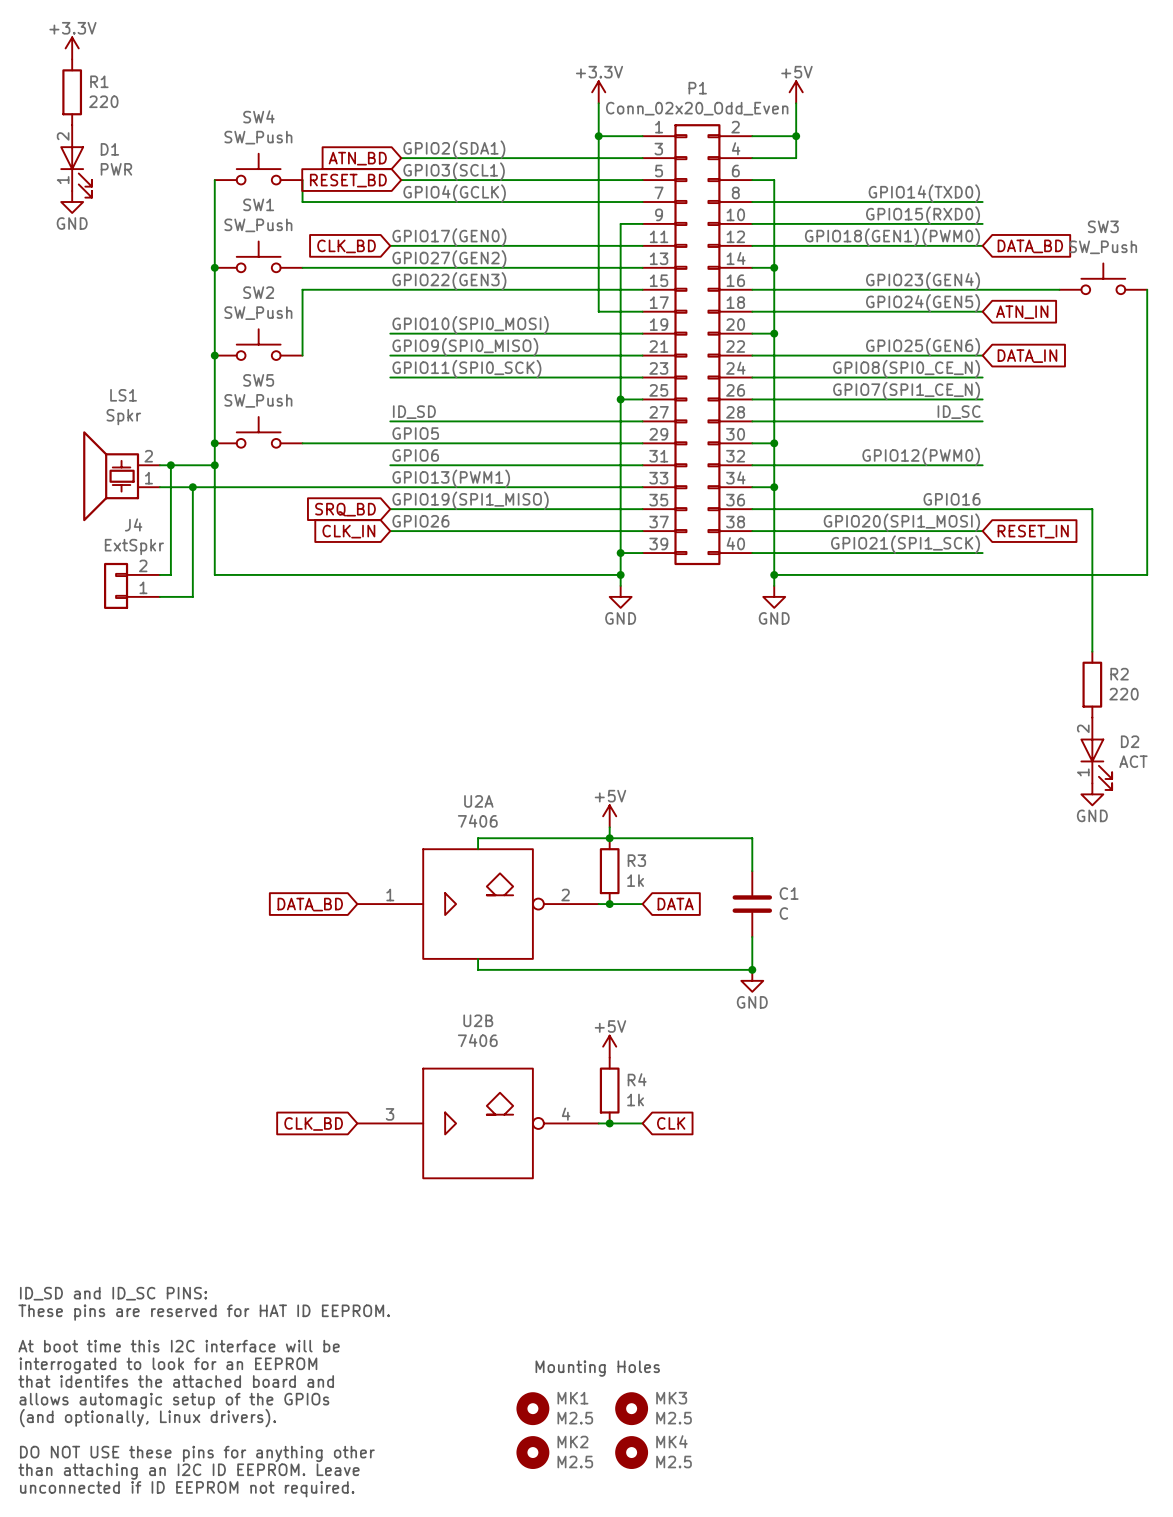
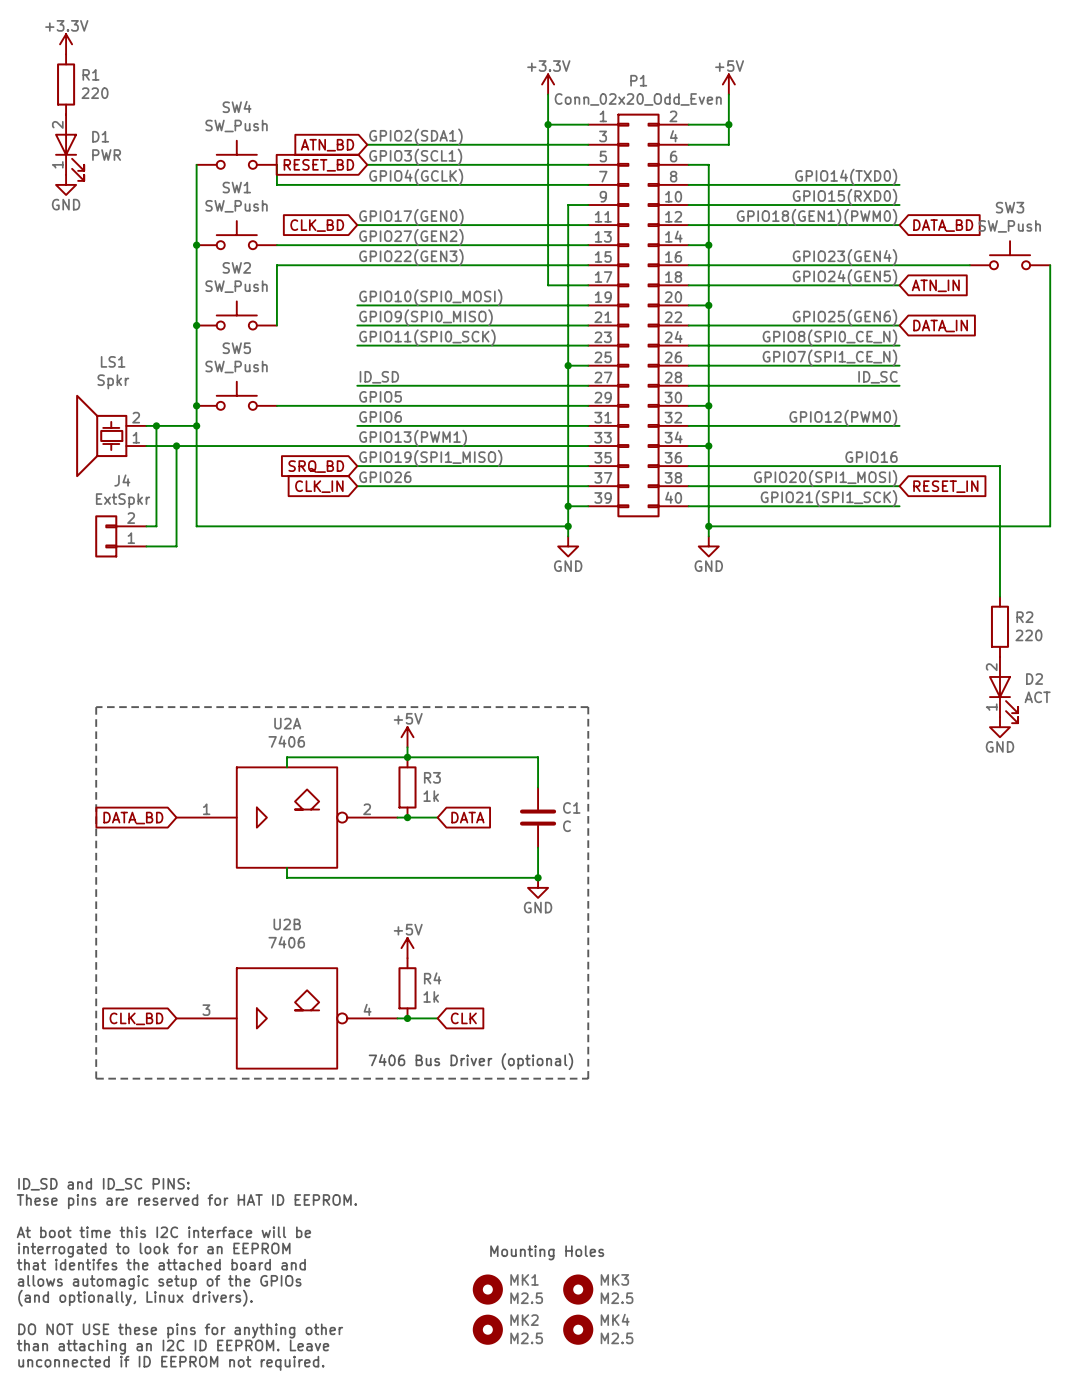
line: none -> (96, 707) (588, 707) (588, 1078) (96, 1078) (96, 707)
power symbol: none -> +5V (407, 737)
power symbol: +5V (609, 816) -> none
junction: none -> (407, 757)
wire: (609, 827) (609, 838) -> (407, 747) (407, 757)
junction: (609, 838) -> none
wire: (478, 849) (478, 838) (752, 838) (752, 871) -> (287, 767) (287, 757) (538, 757) (538, 787)
R3 position: (609, 871) -> (407, 787)
junction: none -> (407, 817)
global label position: DATA_BD (310, 904) -> DATA_BD (133, 818)
U2A position: (478, 904) -> (287, 817)
wire: (598, 904) (642, 904) -> (397, 817) (437, 817)
junction: (609, 904) -> none
global label position: DATA (675, 904) -> DATA (467, 817)
C1 position: (752, 904) -> (538, 817)
wire: (752, 936) (752, 969) (478, 969) (478, 958) -> (538, 847) (538, 877) (287, 877) (287, 867)
junction: none -> (538, 877)
junction: (752, 969) -> none
power symbol position: GND (752, 980) -> GND (538, 887)
power symbol: none -> +5V (407, 948)
power symbol: +5V (609, 1046) -> none
R4 position: (609, 1090) -> (407, 988)
junction: none -> (407, 1018)
global label position: CLK_BD (313, 1123) -> CLK_BD (136, 1018)
U2B position: (478, 1123) -> (287, 1018)
wire: (598, 1123) (642, 1123) -> (397, 1018) (437, 1018)
junction: (609, 1123) -> none
global label position: CLK (671, 1123) -> CLK (463, 1018)
text: none -> 7406 Bus Driver (optional) (470, 1061)

